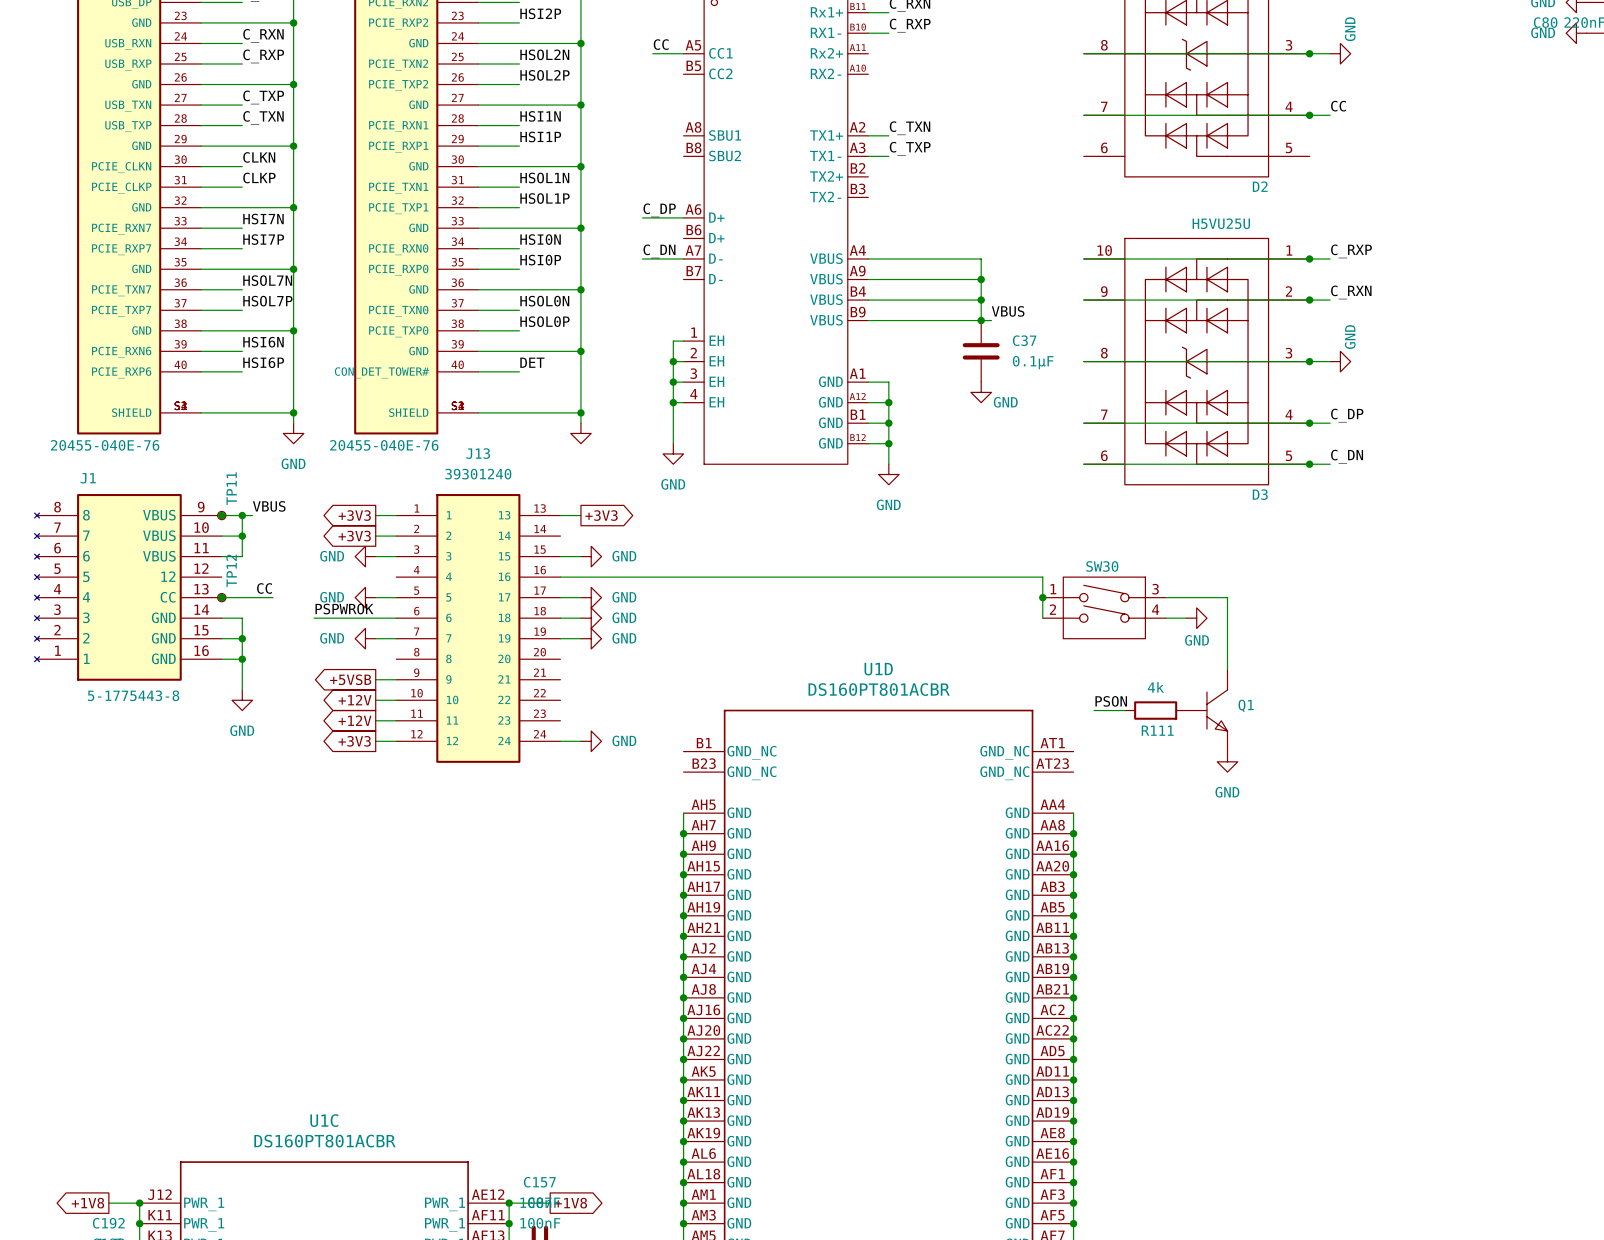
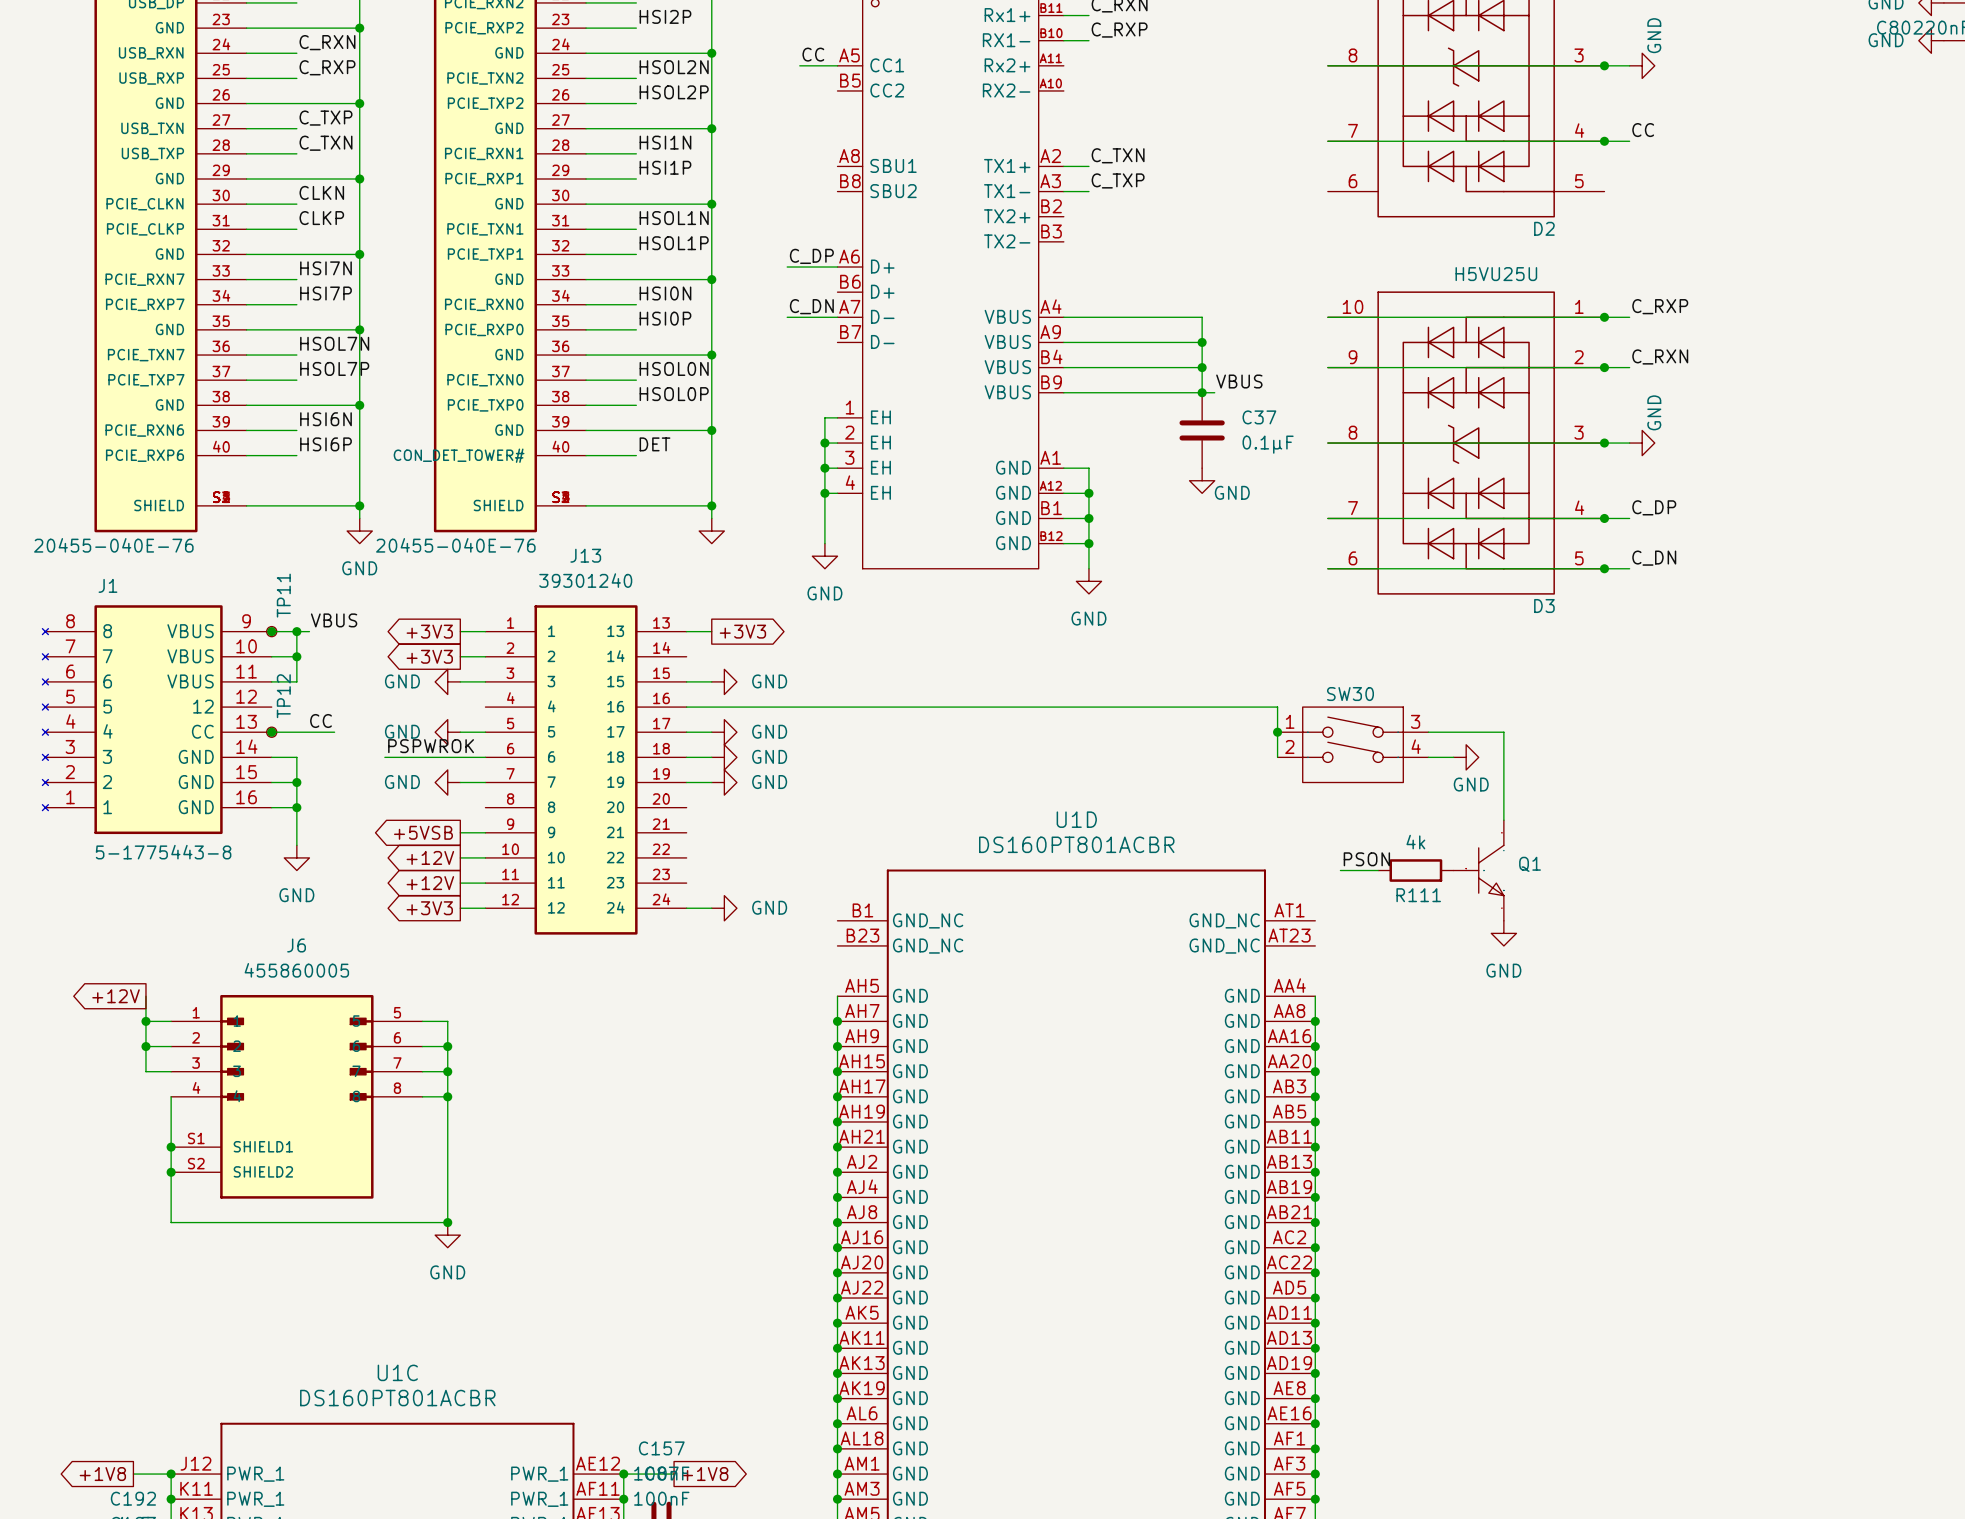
global label: none -> +12V (116, 996)
wire: none -> (145, 996) (145, 1071) (171, 1071)
wire: none -> (145, 1021) (171, 1021)
junction: none -> (145, 1021)
wire: none -> (422, 1021) (447, 1021) (447, 1222) (171, 1222) (171, 1096)
wire: none -> (145, 1046) (171, 1046)
junction: none -> (145, 1046)
wire: none -> (422, 1046) (447, 1046)
junction: none -> (447, 1046)
wire: none -> (422, 1071) (447, 1071)
junction: none -> (447, 1071)
J6: none -> 455860005 (296, 1096)
wire: none -> (422, 1096) (447, 1096)
junction: none -> (447, 1096)
junction: none -> (171, 1147)
junction: none -> (171, 1172)
junction: none -> (447, 1222)
power symbol: none -> GND (447, 1235)

